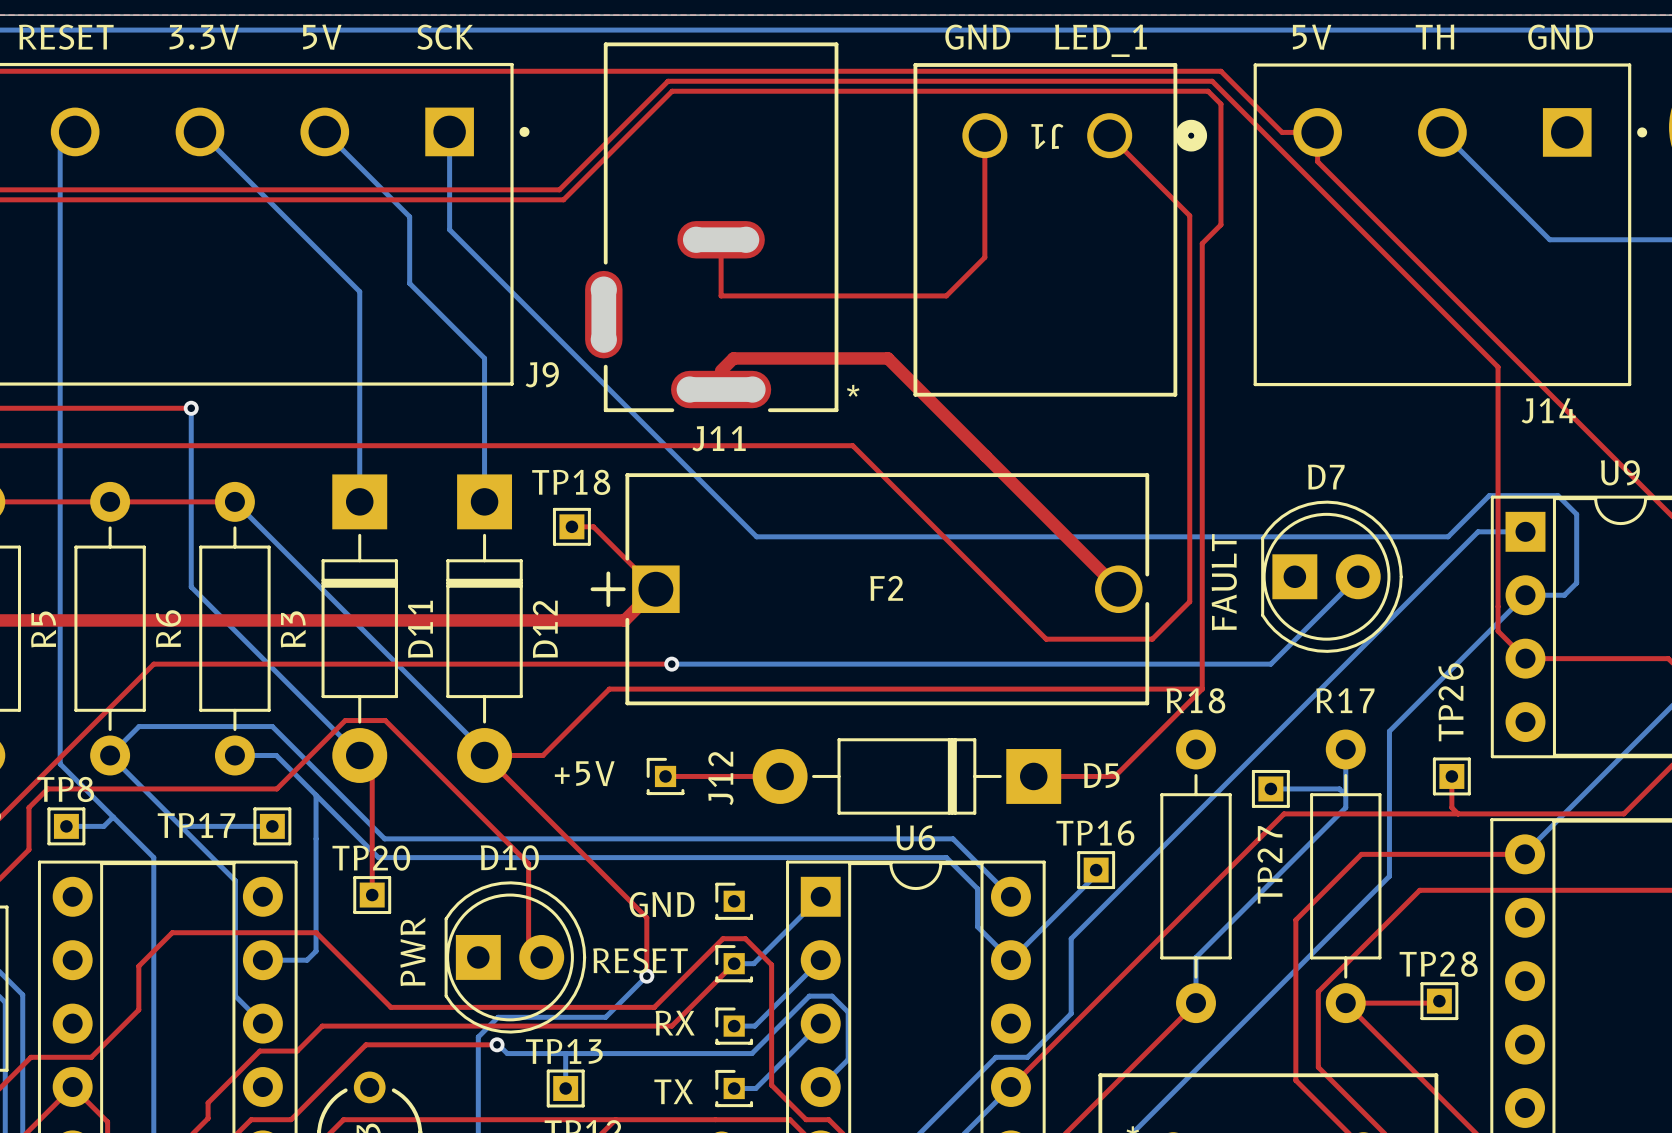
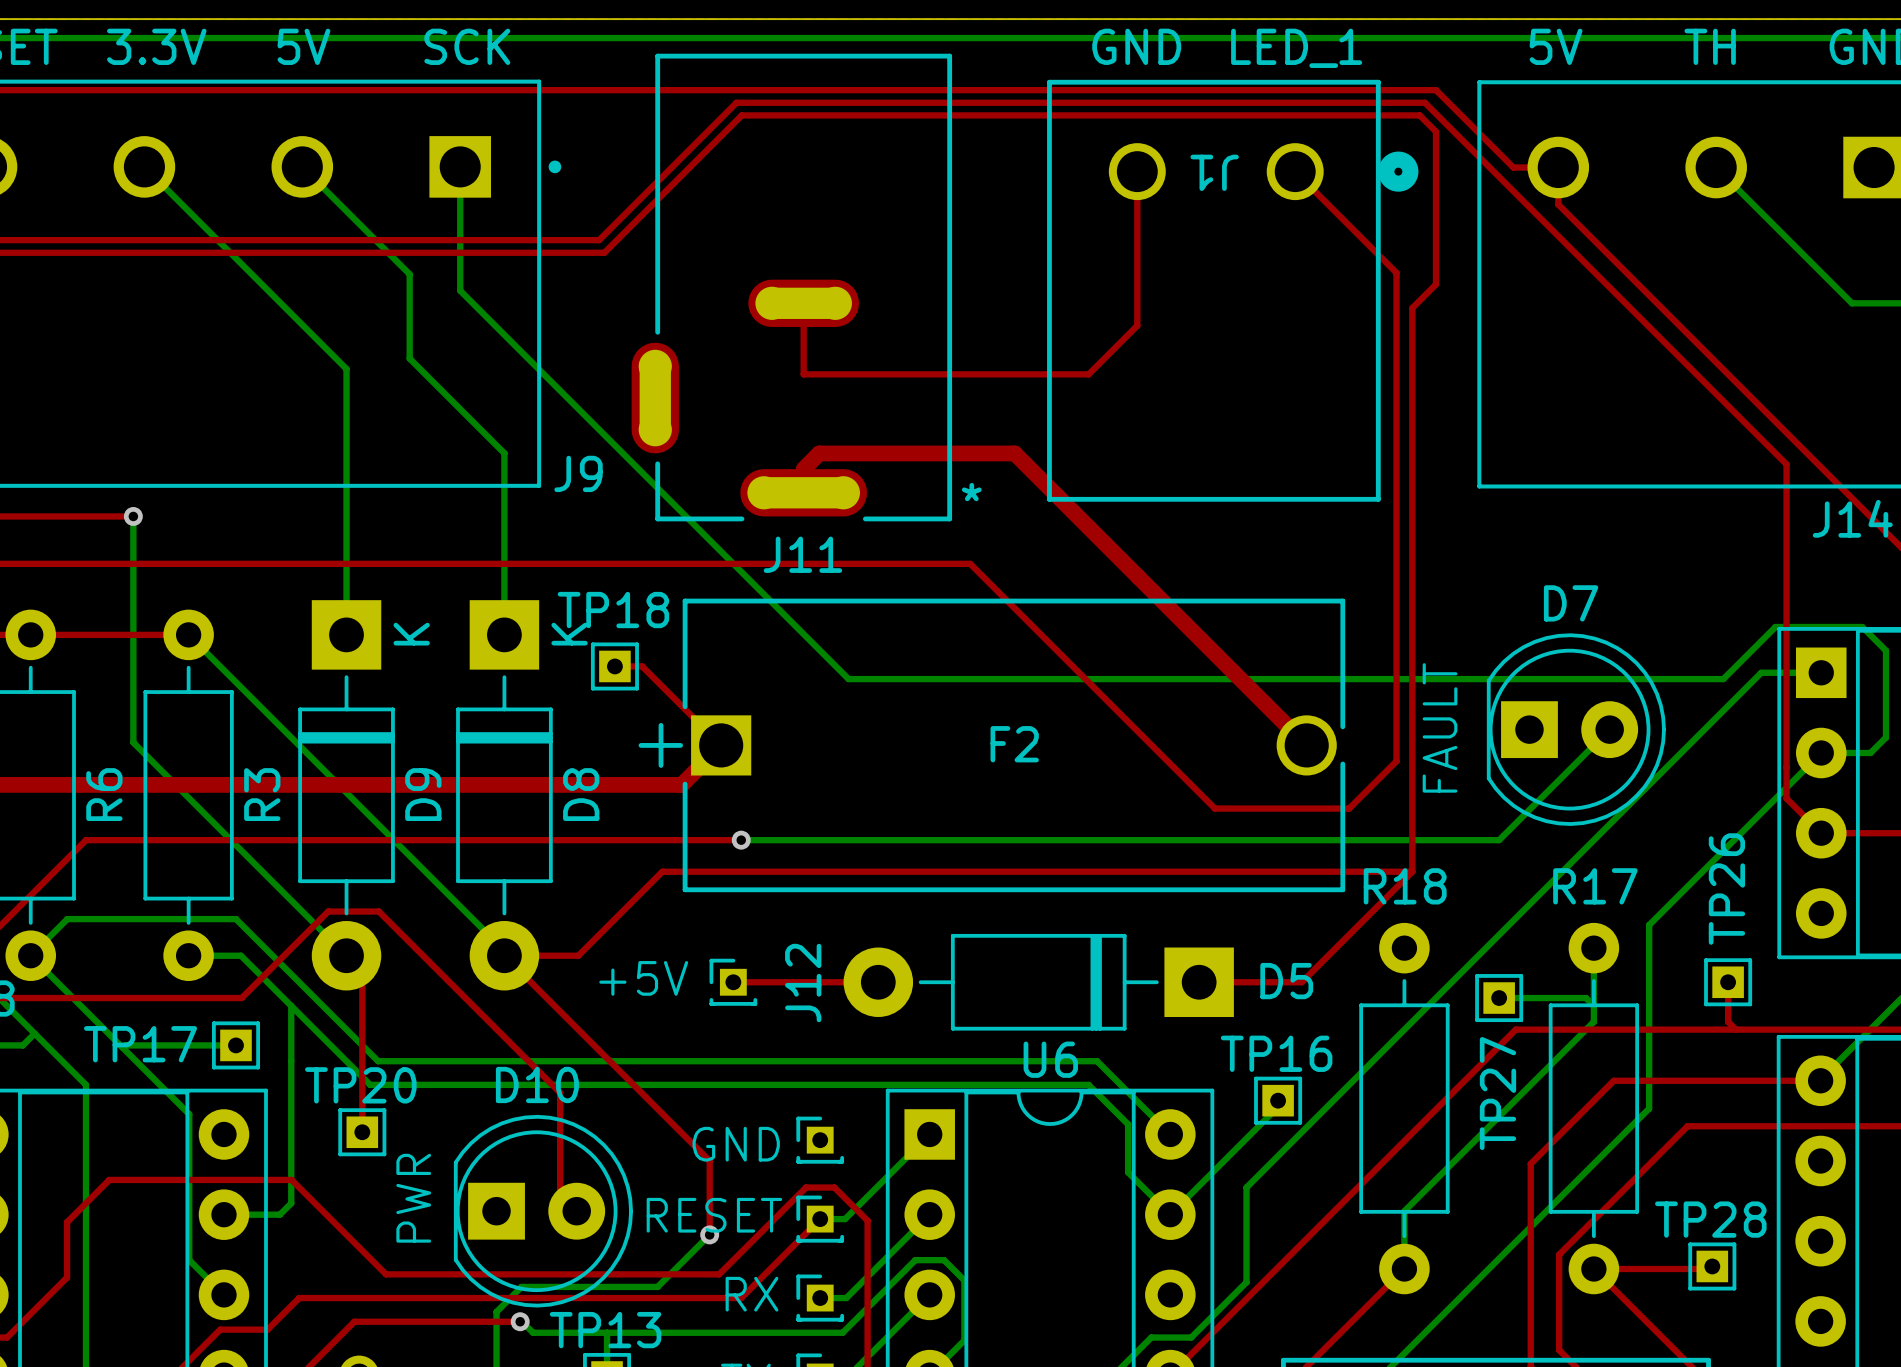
D11 text: none -> K (411, 634)
D12 text: none -> K (569, 634)
D11 name: D11 (420, 629) -> D9 (423, 794)
D12 name: D12 (545, 629) -> D8 (581, 794)

